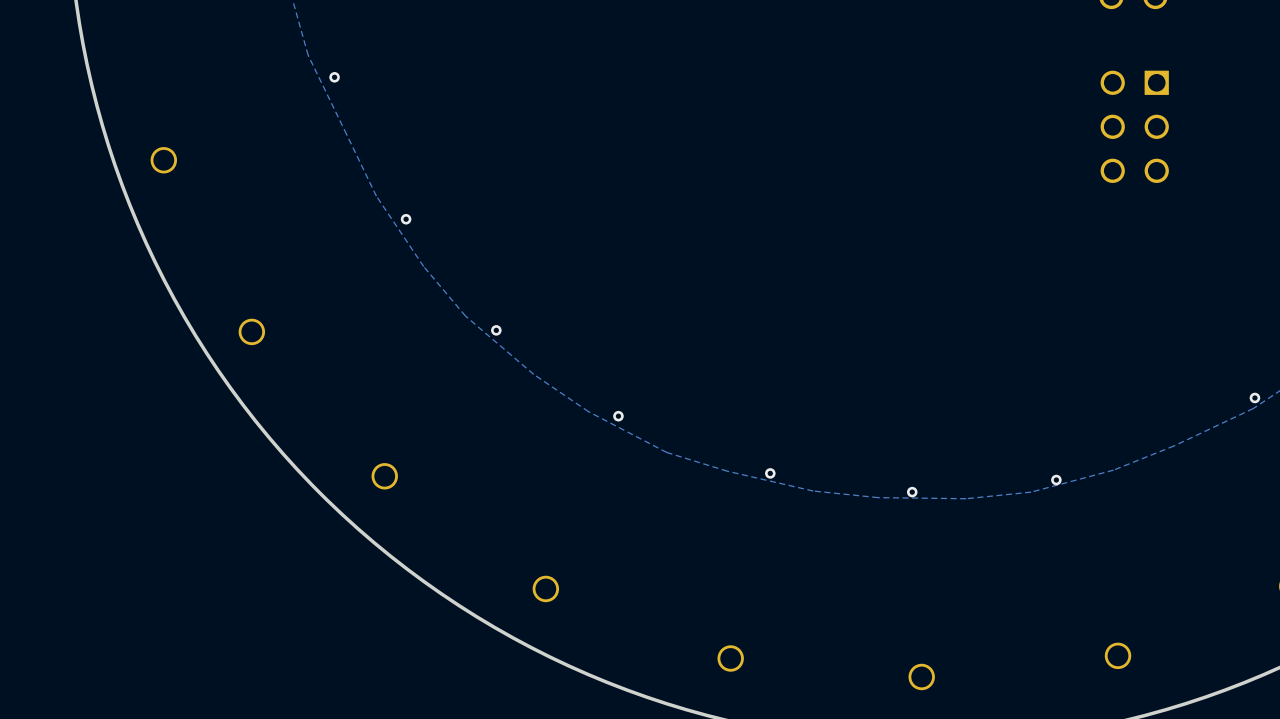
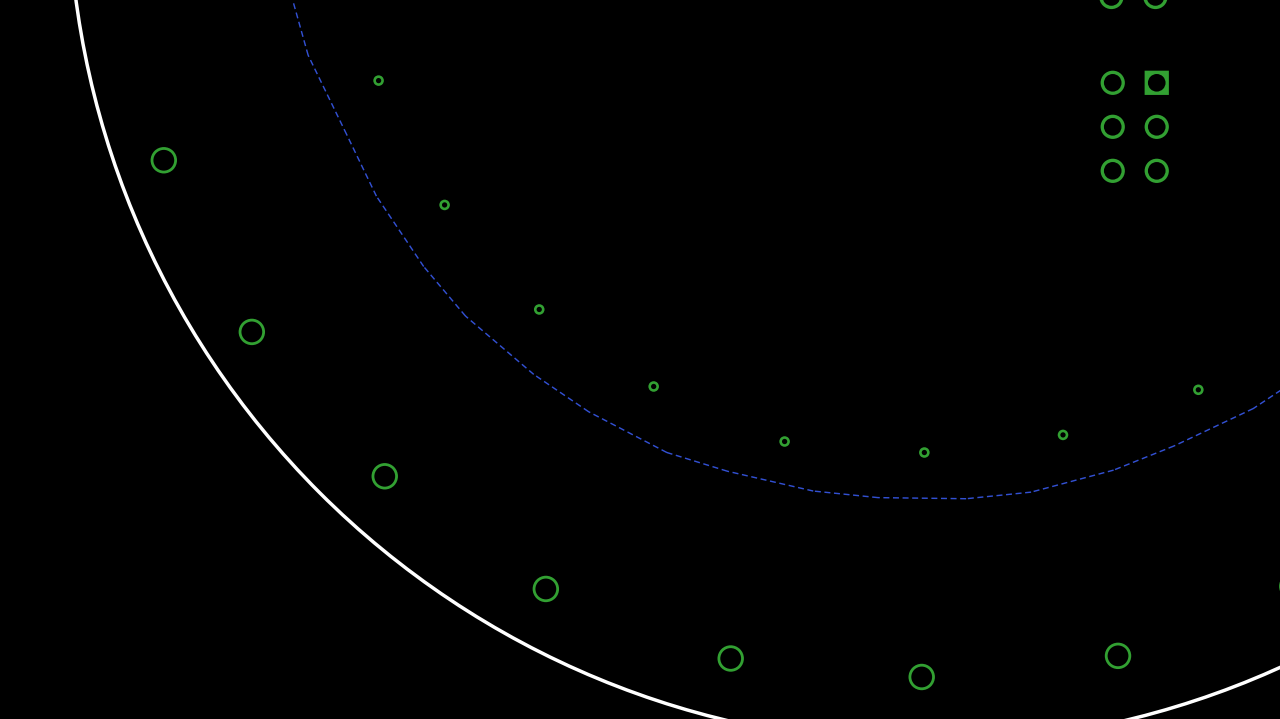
via position: (334, 77) -> (378, 80)
via position: (406, 219) -> (444, 204)
via position: (496, 330) -> (539, 309)
via position: (1254, 397) -> (1198, 389)
via position: (618, 416) -> (653, 386)
via position: (770, 473) -> (784, 441)
via position: (1056, 480) -> (1062, 434)
via position: (912, 492) -> (924, 452)

